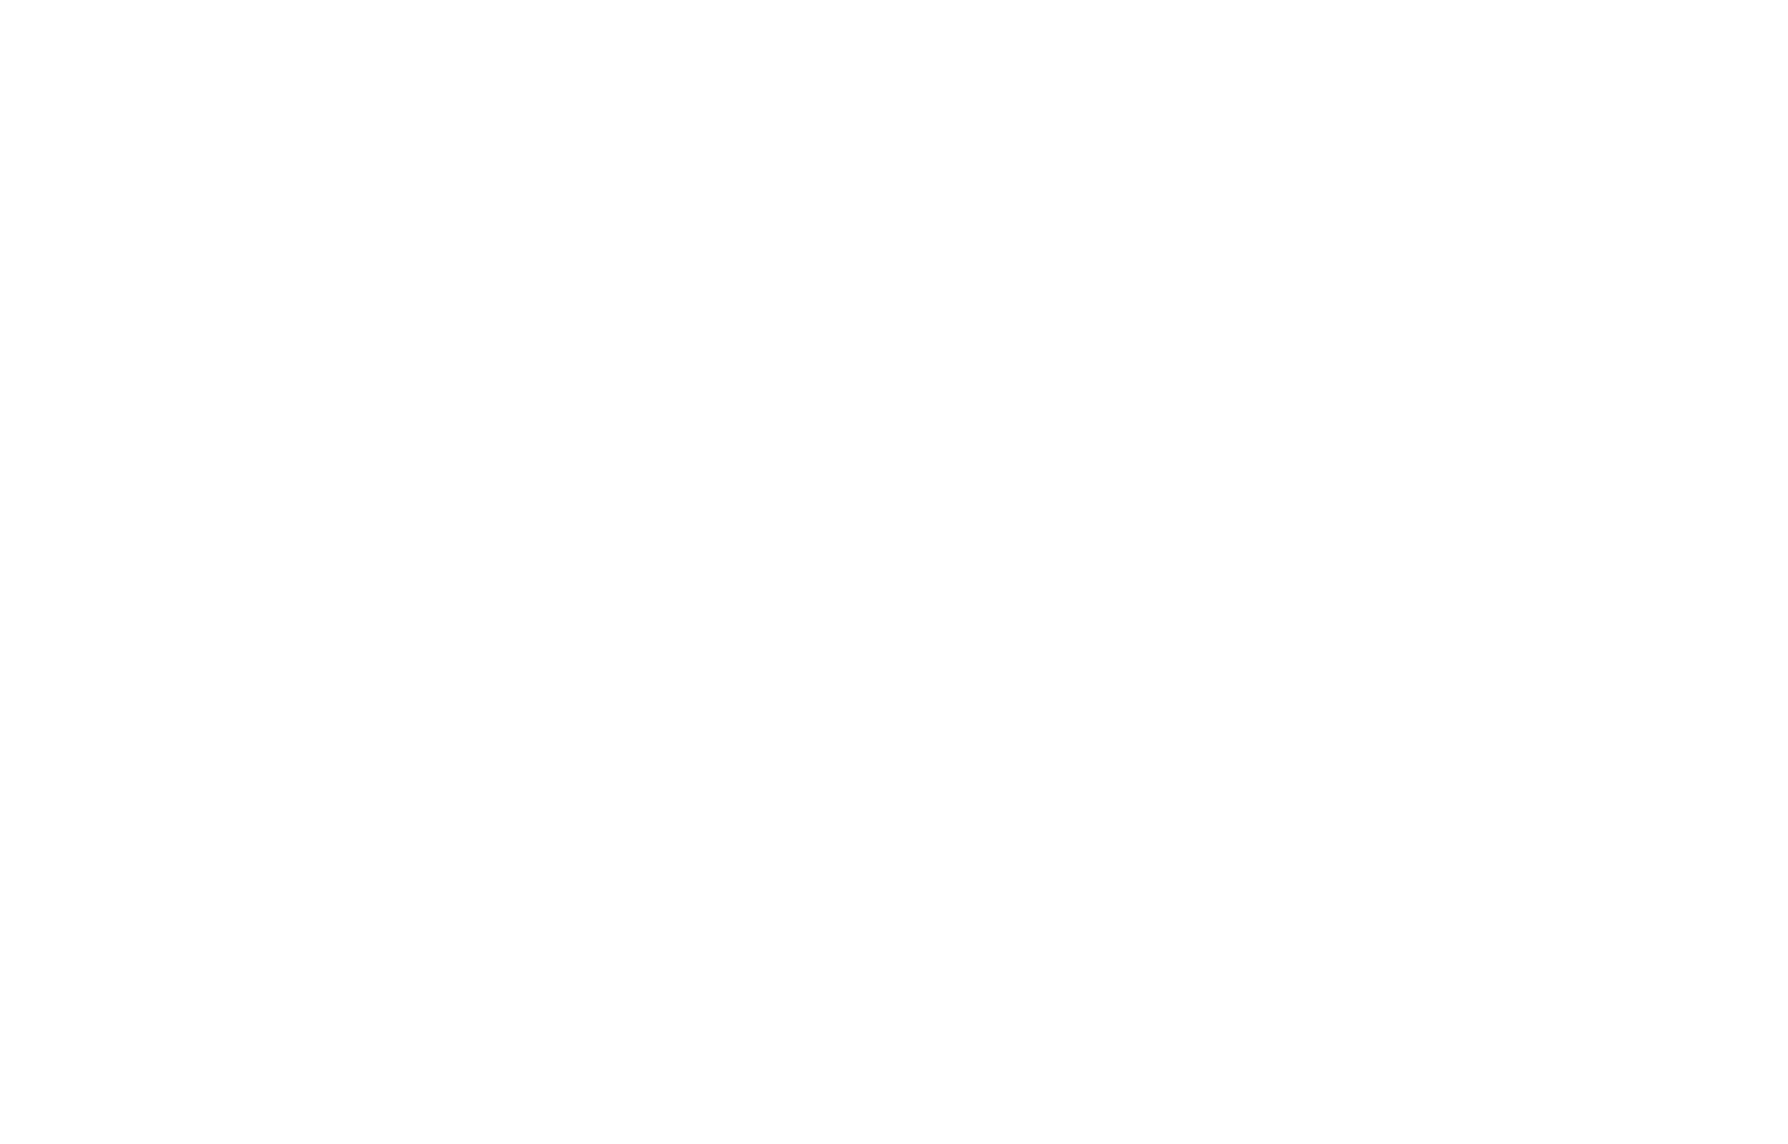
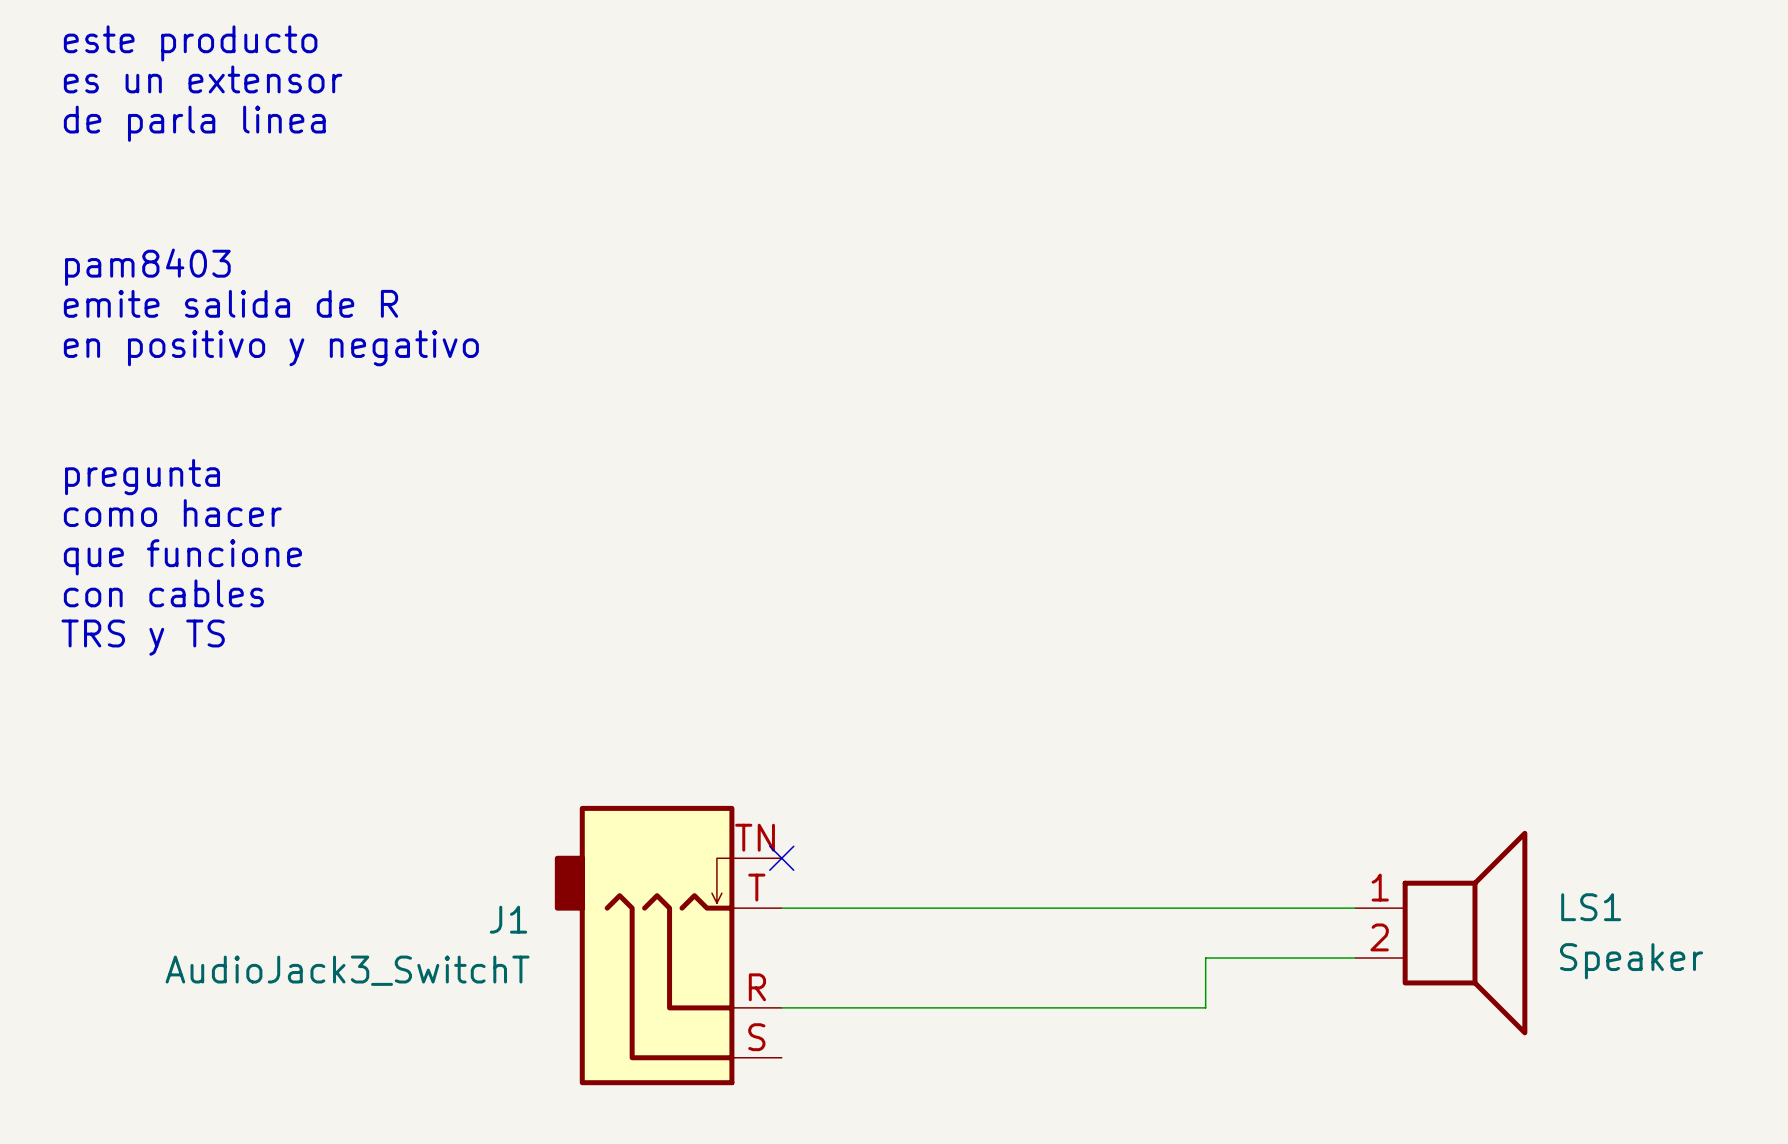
text: none -> este producto (190, 43)
text: none -> es un extensor (203, 79)
text: none -> de parla linea (194, 123)
text: none -> pam8403 (147, 267)
text: none -> emite salida de R (230, 303)
text: none -> en positivo y negativo (271, 348)
text: none -> pregunta (142, 477)
text: none -> como hacer (172, 513)
text: none -> que funcione (182, 557)
text: none -> con cables (163, 593)
text: none -> TRS y TS (143, 637)
no-connect mark: none -> (781, 858)
wire: none -> (781, 908) (1355, 908)
LS1: none -> Speaker (1441, 933)
J1: none -> AudioJack3_SwitchT (668, 945)
wire: none -> (1355, 958) (1205, 958) (1205, 1007) (781, 1007)

